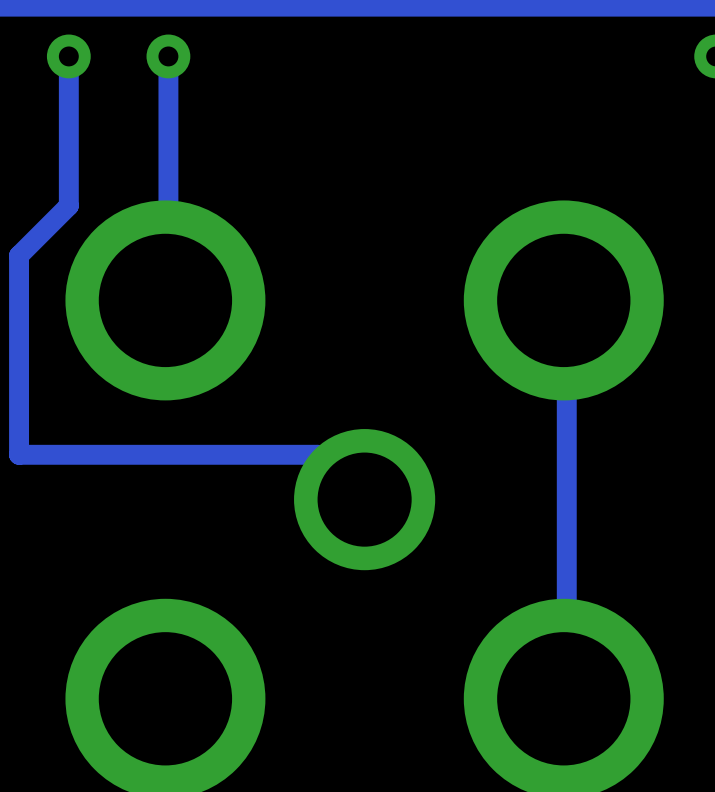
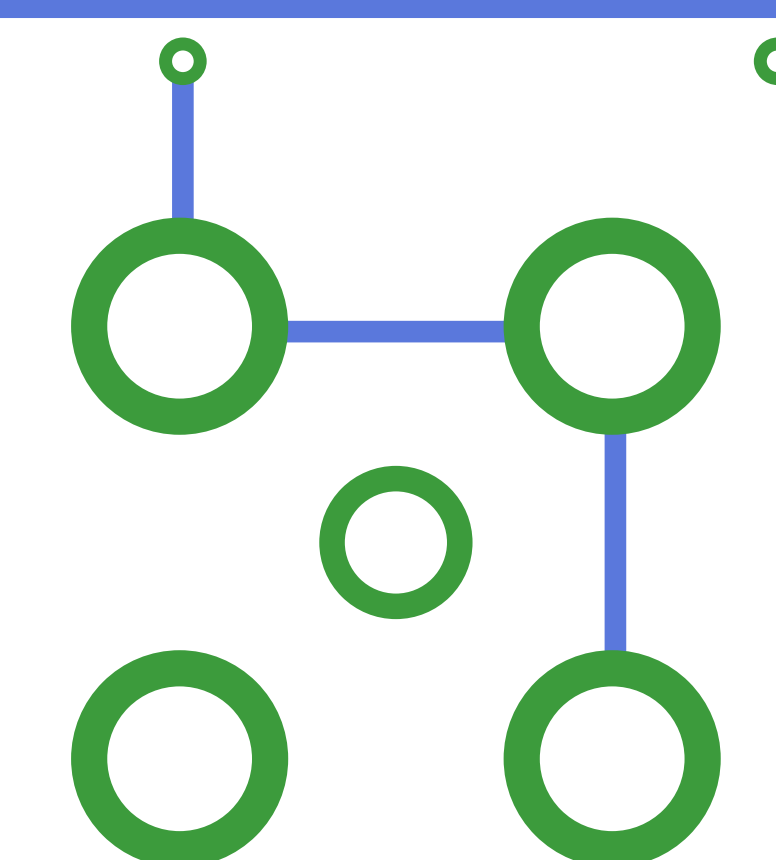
track: (68, 56) (68, 205) (19, 255) (19, 454) (317, 454) (364, 499) -> none
via: (68, 56) -> none
track: none -> (612, 326) (561, 331) (182, 331) (179, 326)

